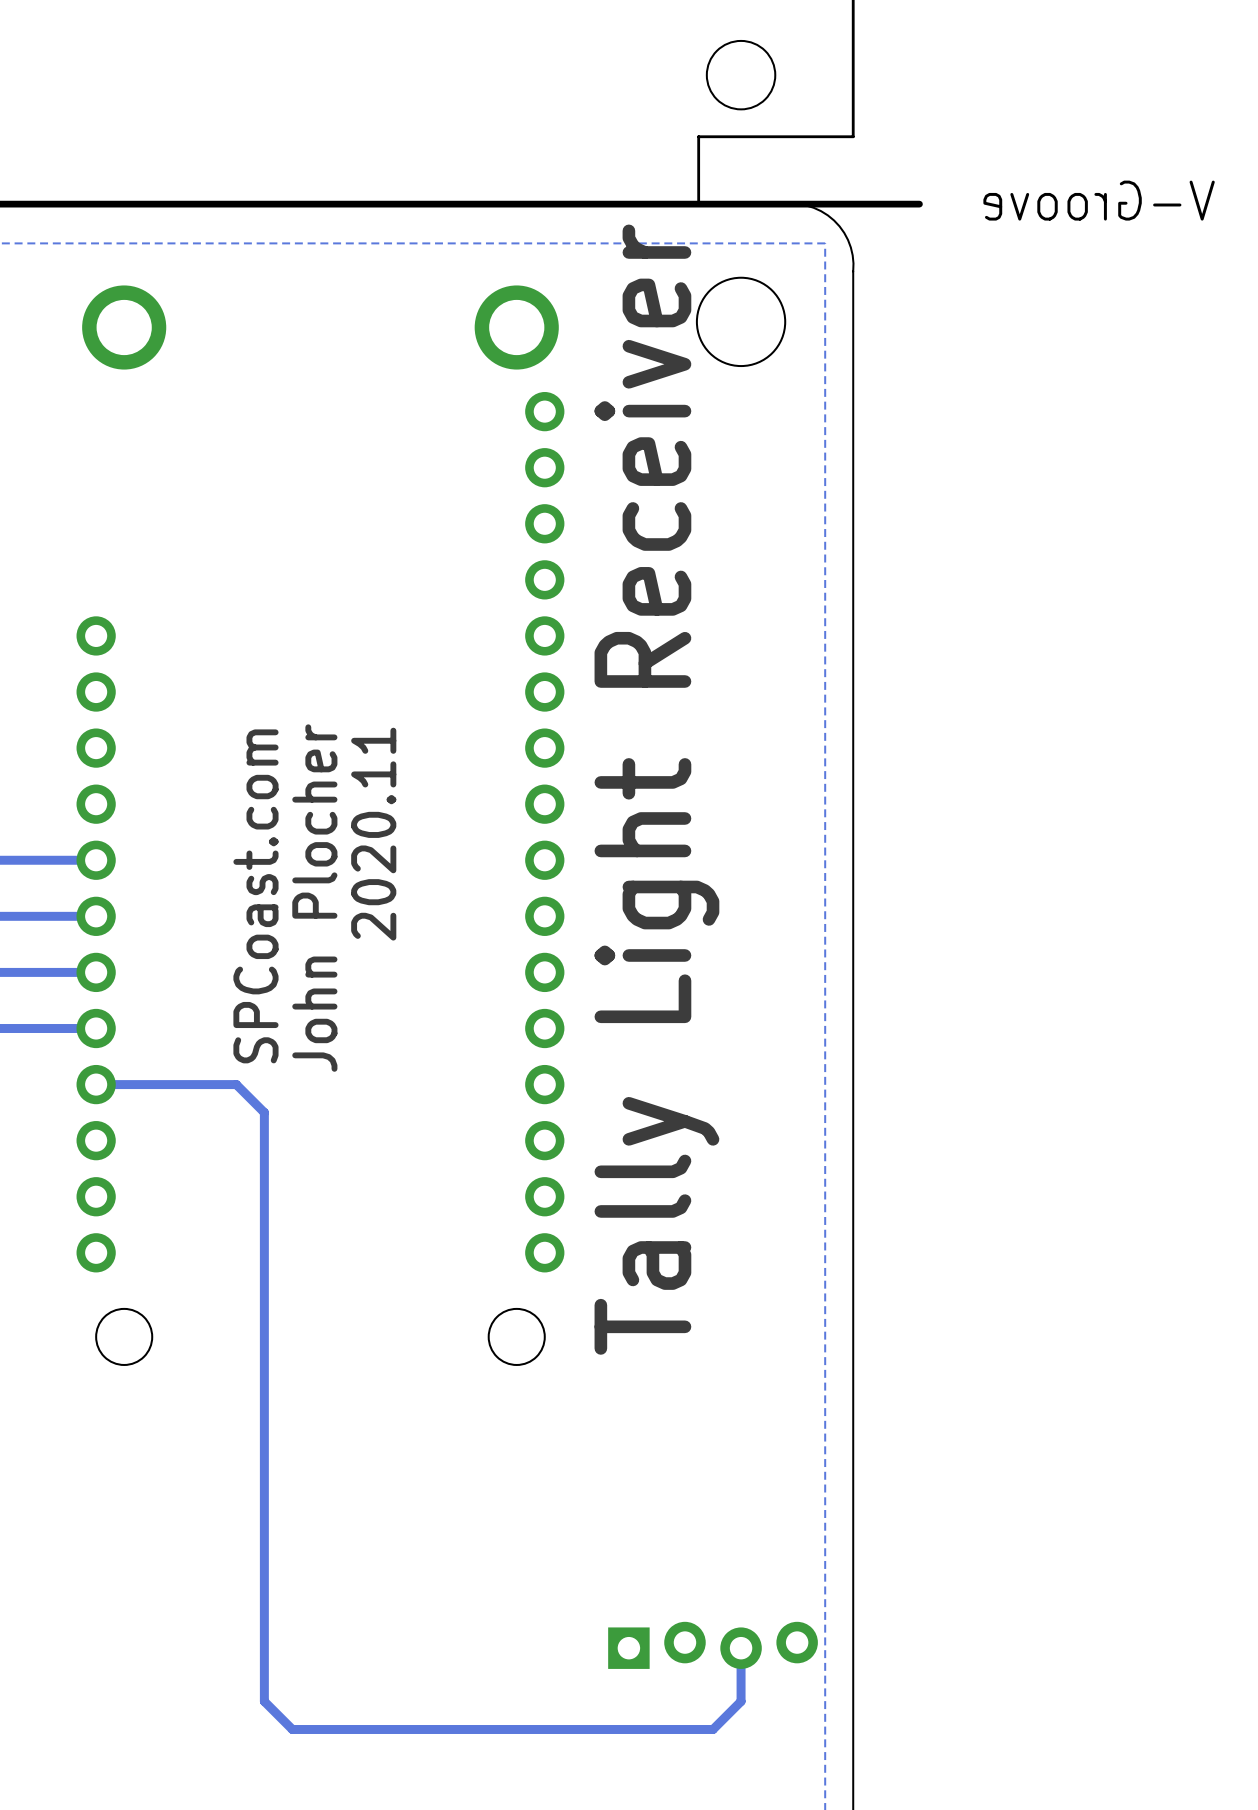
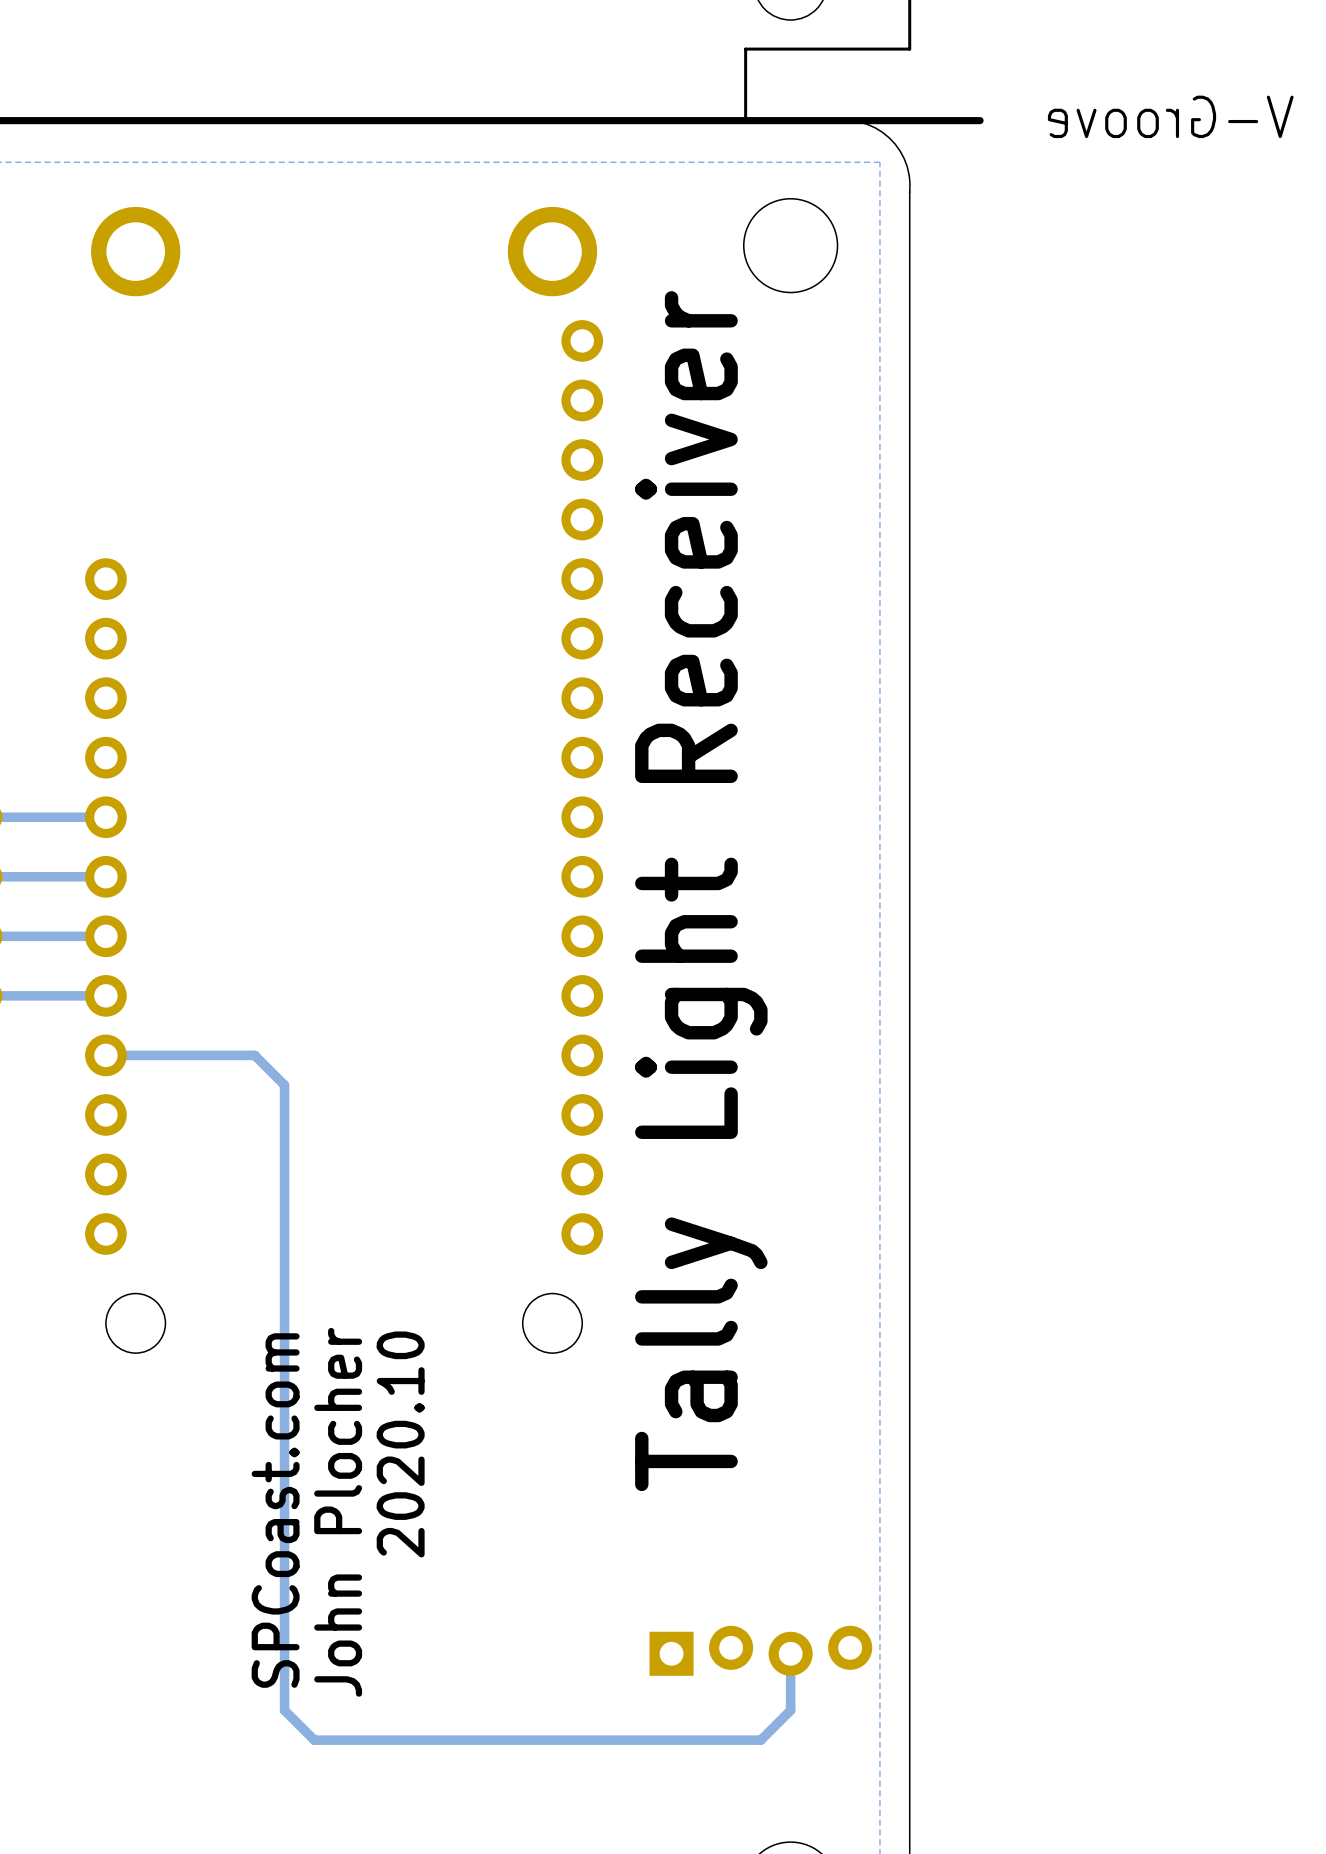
text position: Tally Light Receiver (656, 789) -> Tally Light Receiver (701, 891)
text: 2020.11 (373, 834) -> none
text: SPCoast.com (255, 896) -> none
text: John Plocher (314, 898) -> none
text: none -> 2020.10 (400, 1444)
text: none -> SPCoast.com (275, 1510)
text: none -> John Plocher (338, 1512)

